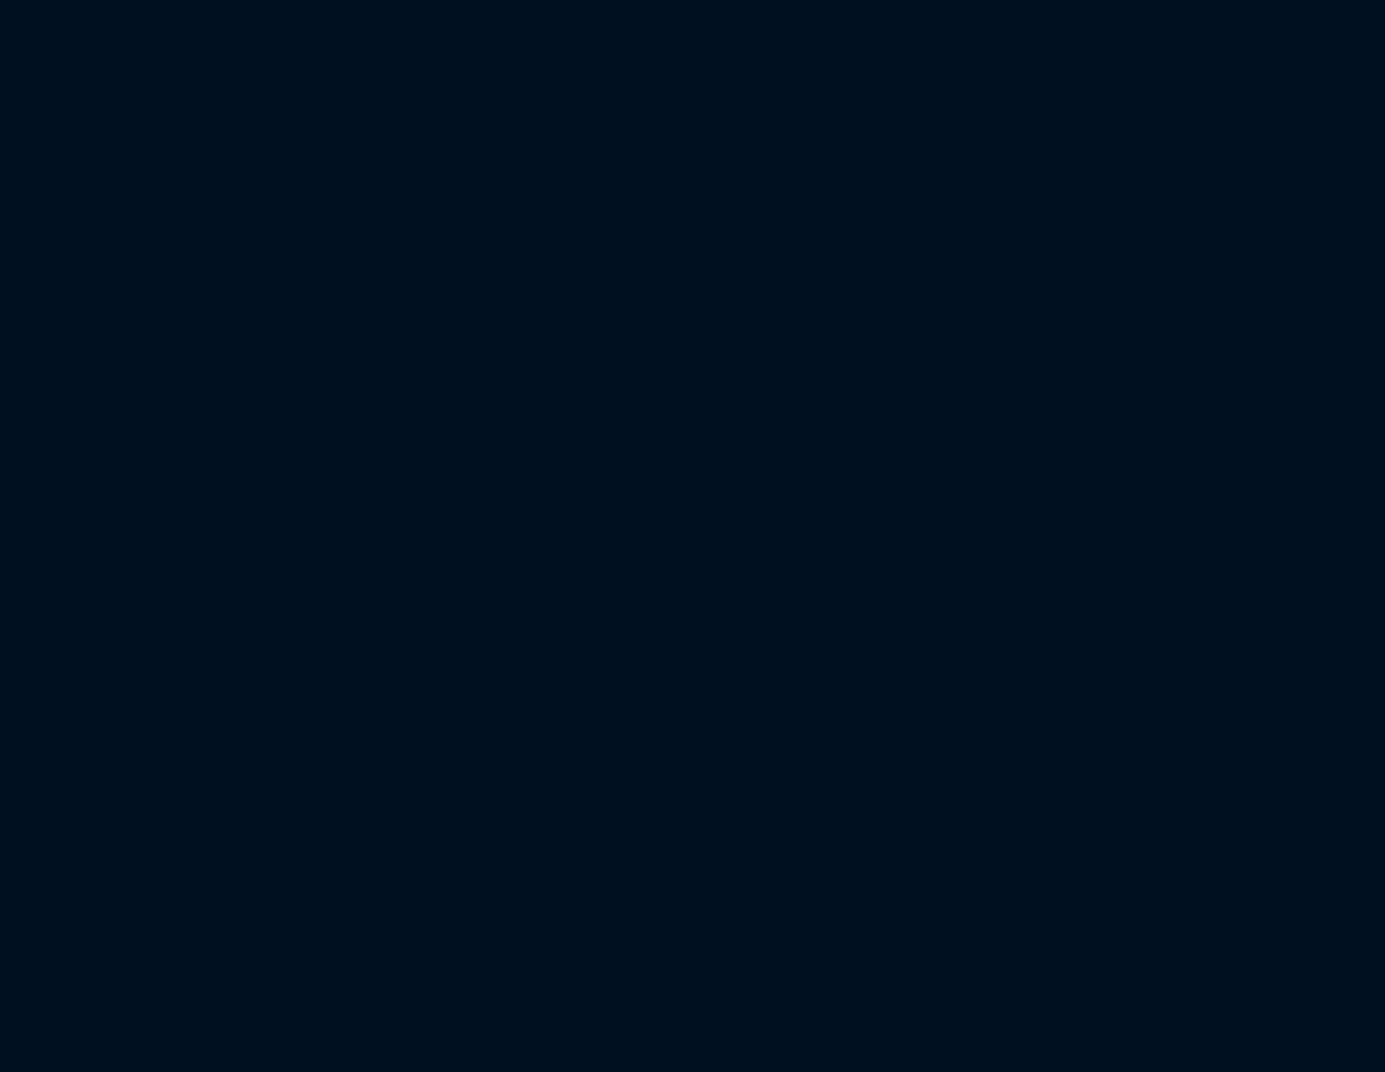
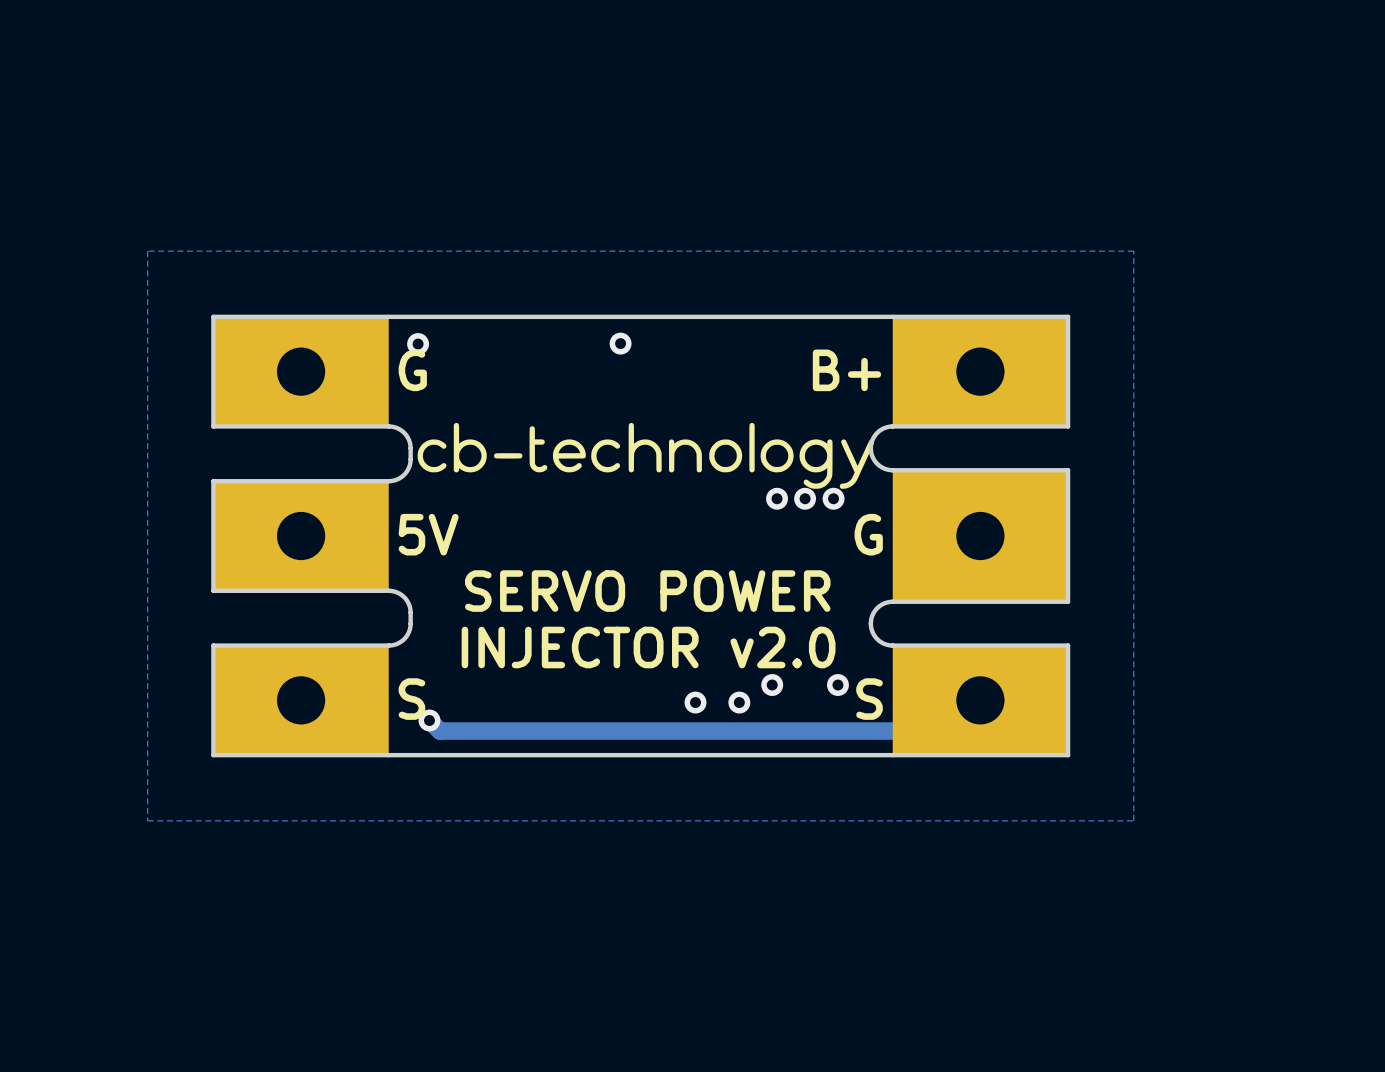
zone outline: none -> (1133, 251) (147, 251) (147, 820) (1133, 820) (1133, 251)
board edge: none -> (892, 316) (388, 316)
via: none -> (620, 343)
via: none -> (418, 344)
text: none -> G (412, 370)
text: none -> B+ (846, 370)
part: none -> (301, 371)
part: none -> (980, 371)
drawing: none -> [417, 422, 875, 489]
board edge: none -> (388, 426) (397, 428) (404, 432) (408, 439) (410, 448) (410, 462) (407, 470) (399, 478) (388, 481)
board edge: none -> (892, 426) (884, 428) (877, 432) (872, 439) (870, 448) (872, 456) (877, 463) (884, 468) (892, 470)
via: none -> (777, 498)
via: none -> (805, 498)
via: none -> (833, 498)
text: none -> 5V (428, 534)
text: none -> G (868, 534)
part: none -> (301, 536)
part: none -> (980, 536)
board edge: none -> (388, 590) (397, 592) (404, 597) (408, 604) (410, 612) (410, 626) (407, 634) (399, 642) (388, 645)
text: none -> SERVO POWER (647, 591)
board edge: none -> (892, 601) (884, 603) (877, 608) (872, 615) (870, 623) (872, 632) (877, 639) (884, 643) (892, 645)
text: none -> INJECTOR v2.0 (648, 647)
via: none -> (772, 685)
via: none -> (837, 685)
text: none -> S (411, 699)
text: none -> S (869, 699)
part: none -> (301, 700)
track: none -> (980, 700) (949, 731) (440, 731) (429, 720)
part: none -> (980, 700)
via: none -> (695, 702)
via: none -> (739, 702)
via: none -> (429, 720)
board edge: none -> (892, 755) (388, 755)

